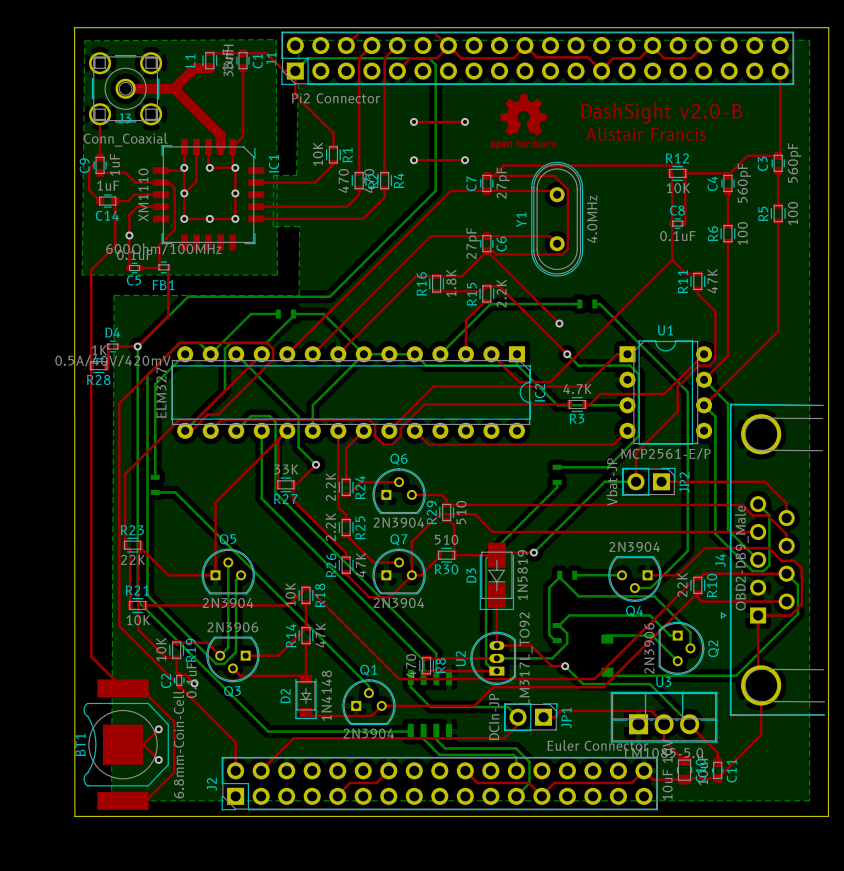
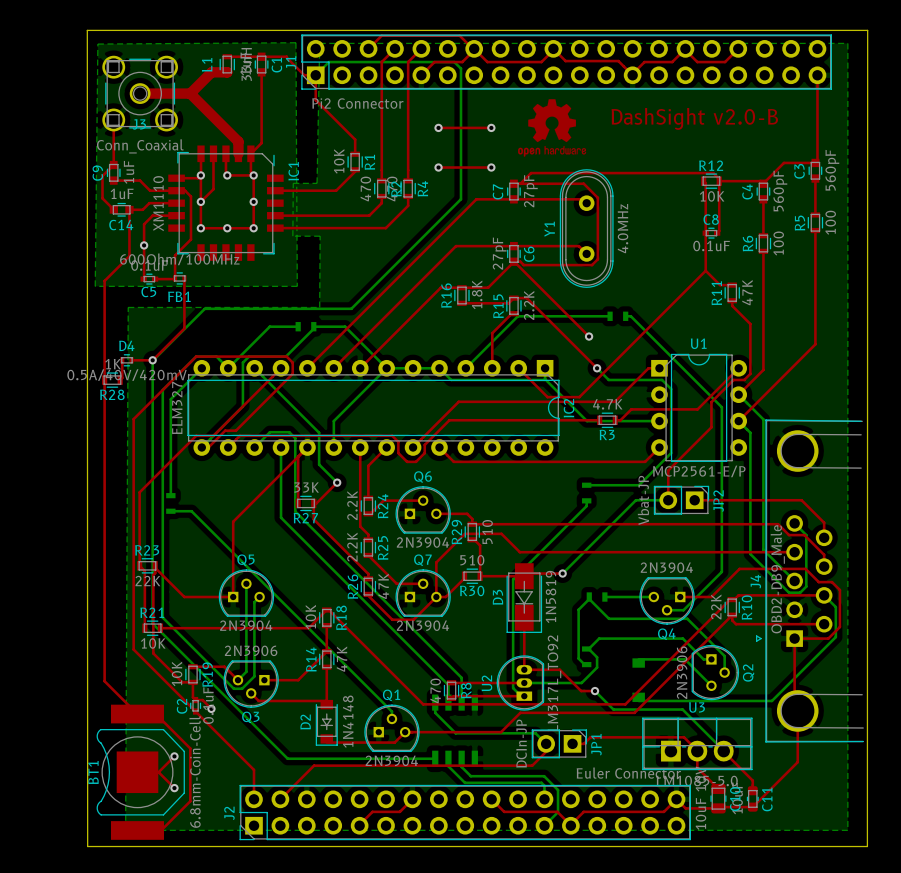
text: Alistair Francis (646, 133) -> none

